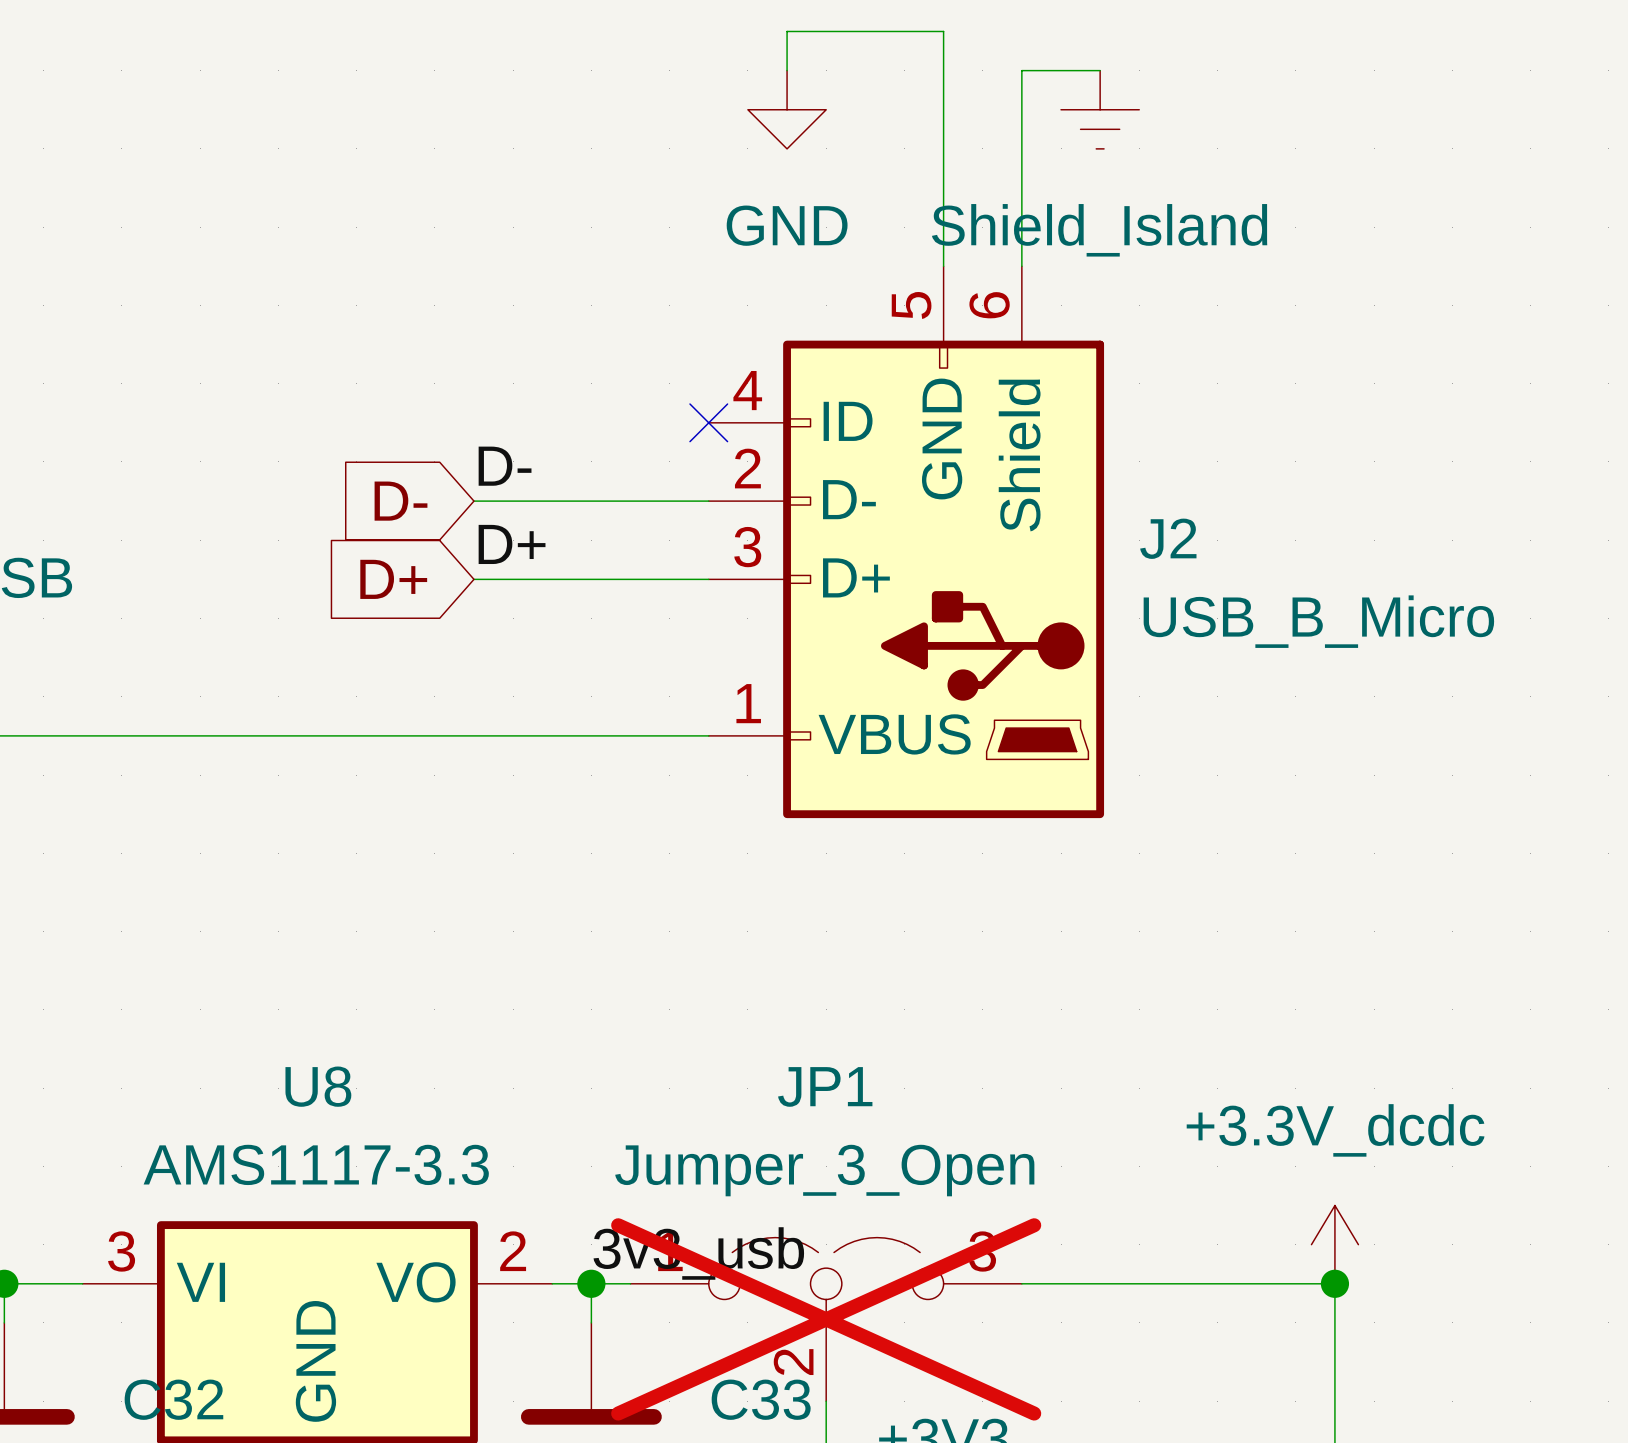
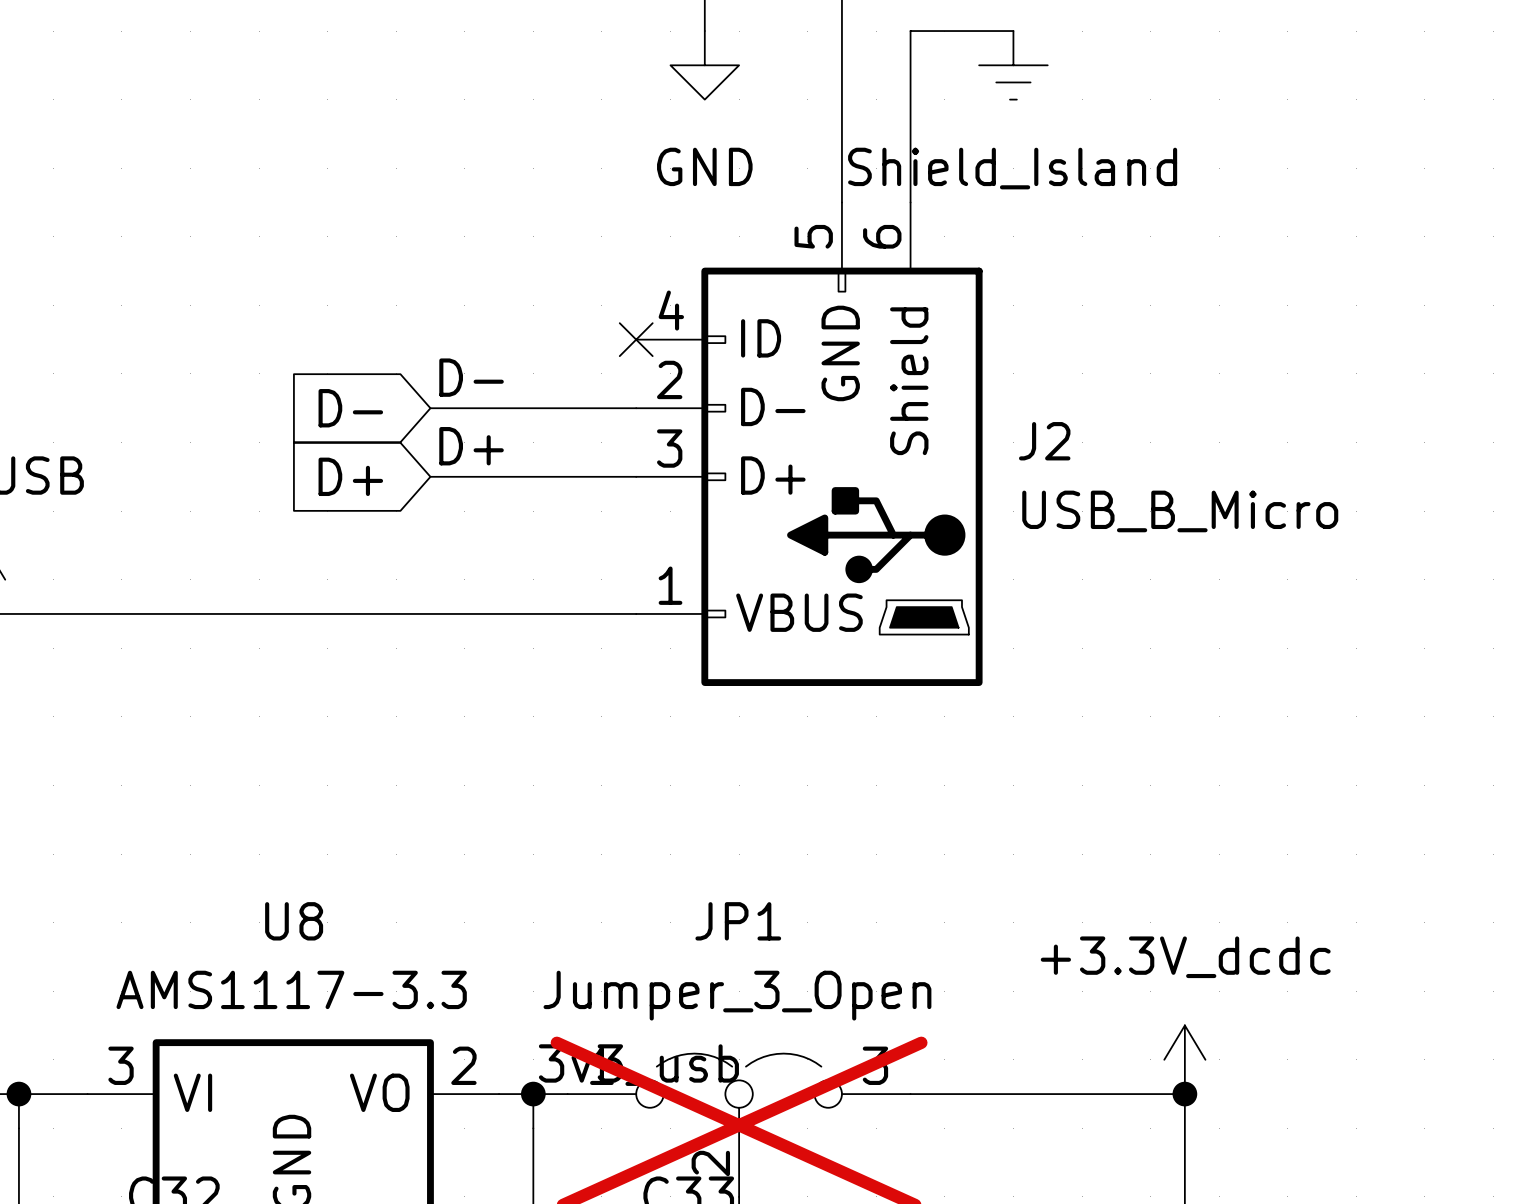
wire: none -> (979, 31) (1013, 31)
power symbol position: Shield_Island (1100, 109) -> Shield_Island (1013, 65)

